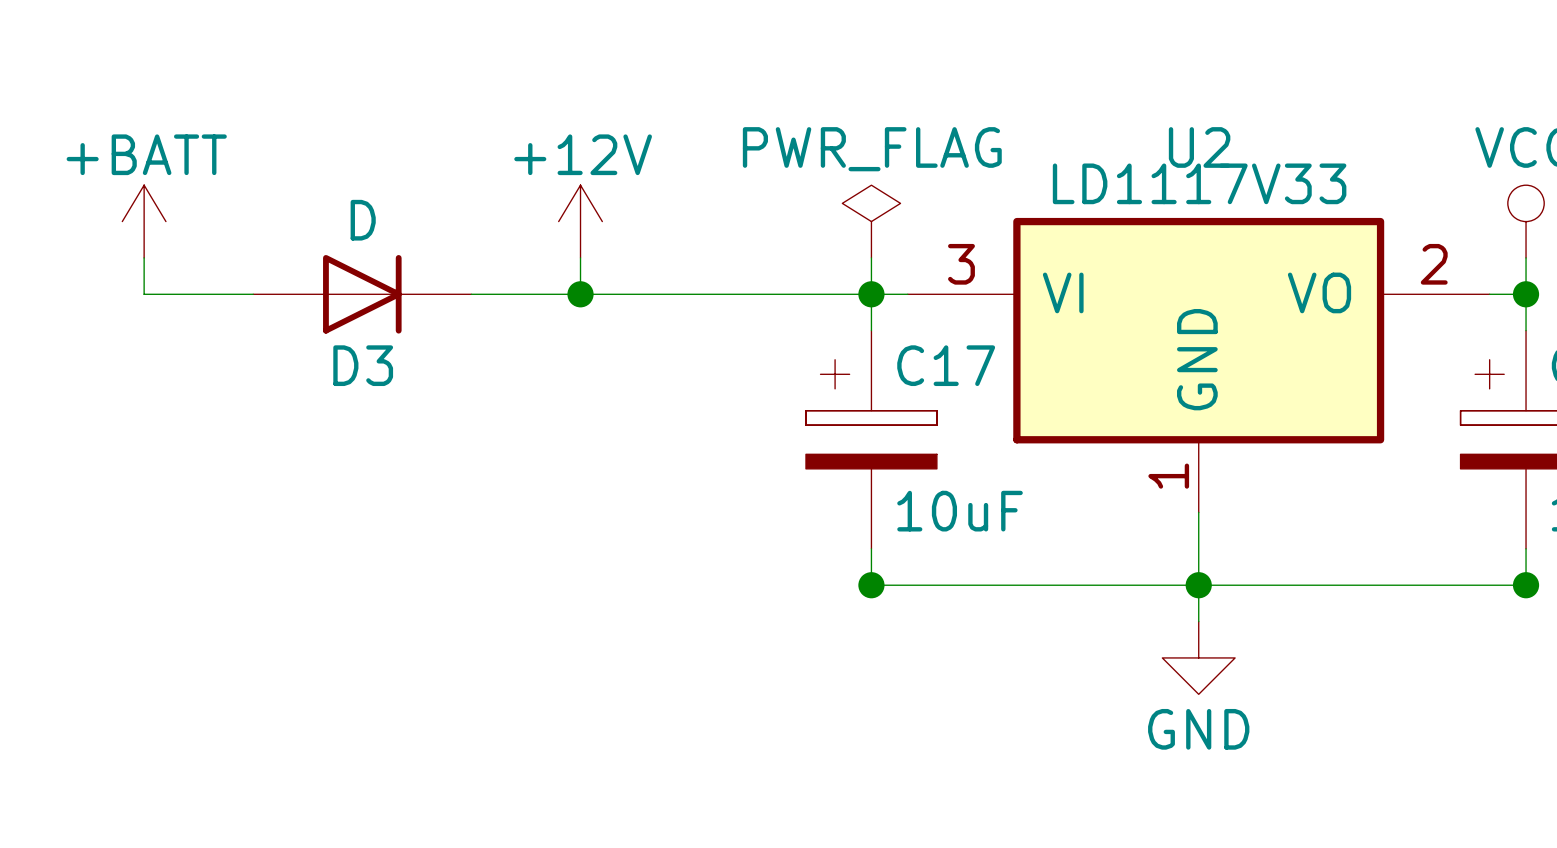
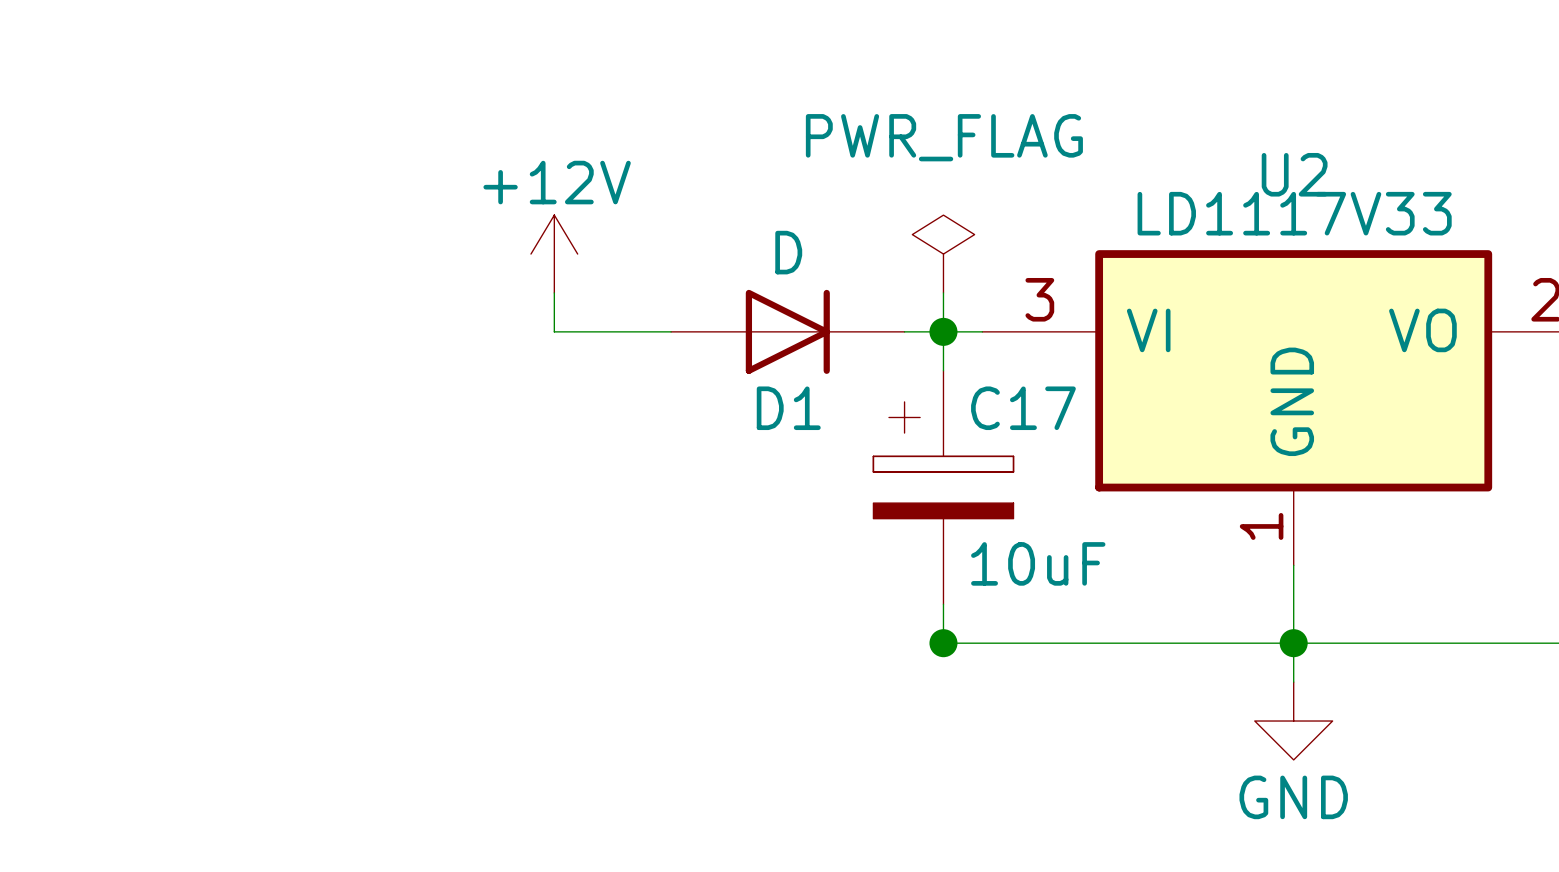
power symbol text position: PWR_FLAG (872, 149) -> PWR_FLAG (944, 137)
power symbol: +BATT (144, 221) -> none
power symbol position: +12V (580, 221) -> +12V (554, 254)
wire: (144, 257) (144, 294) (253, 294) -> none
wire: (580, 257) (580, 294) -> none
D3: D (362, 294) -> none
wire: (471, 294) (507, 294) -> (554, 292) (554, 331)
junction: (580, 294) -> none
D1: none -> D (787, 331)

